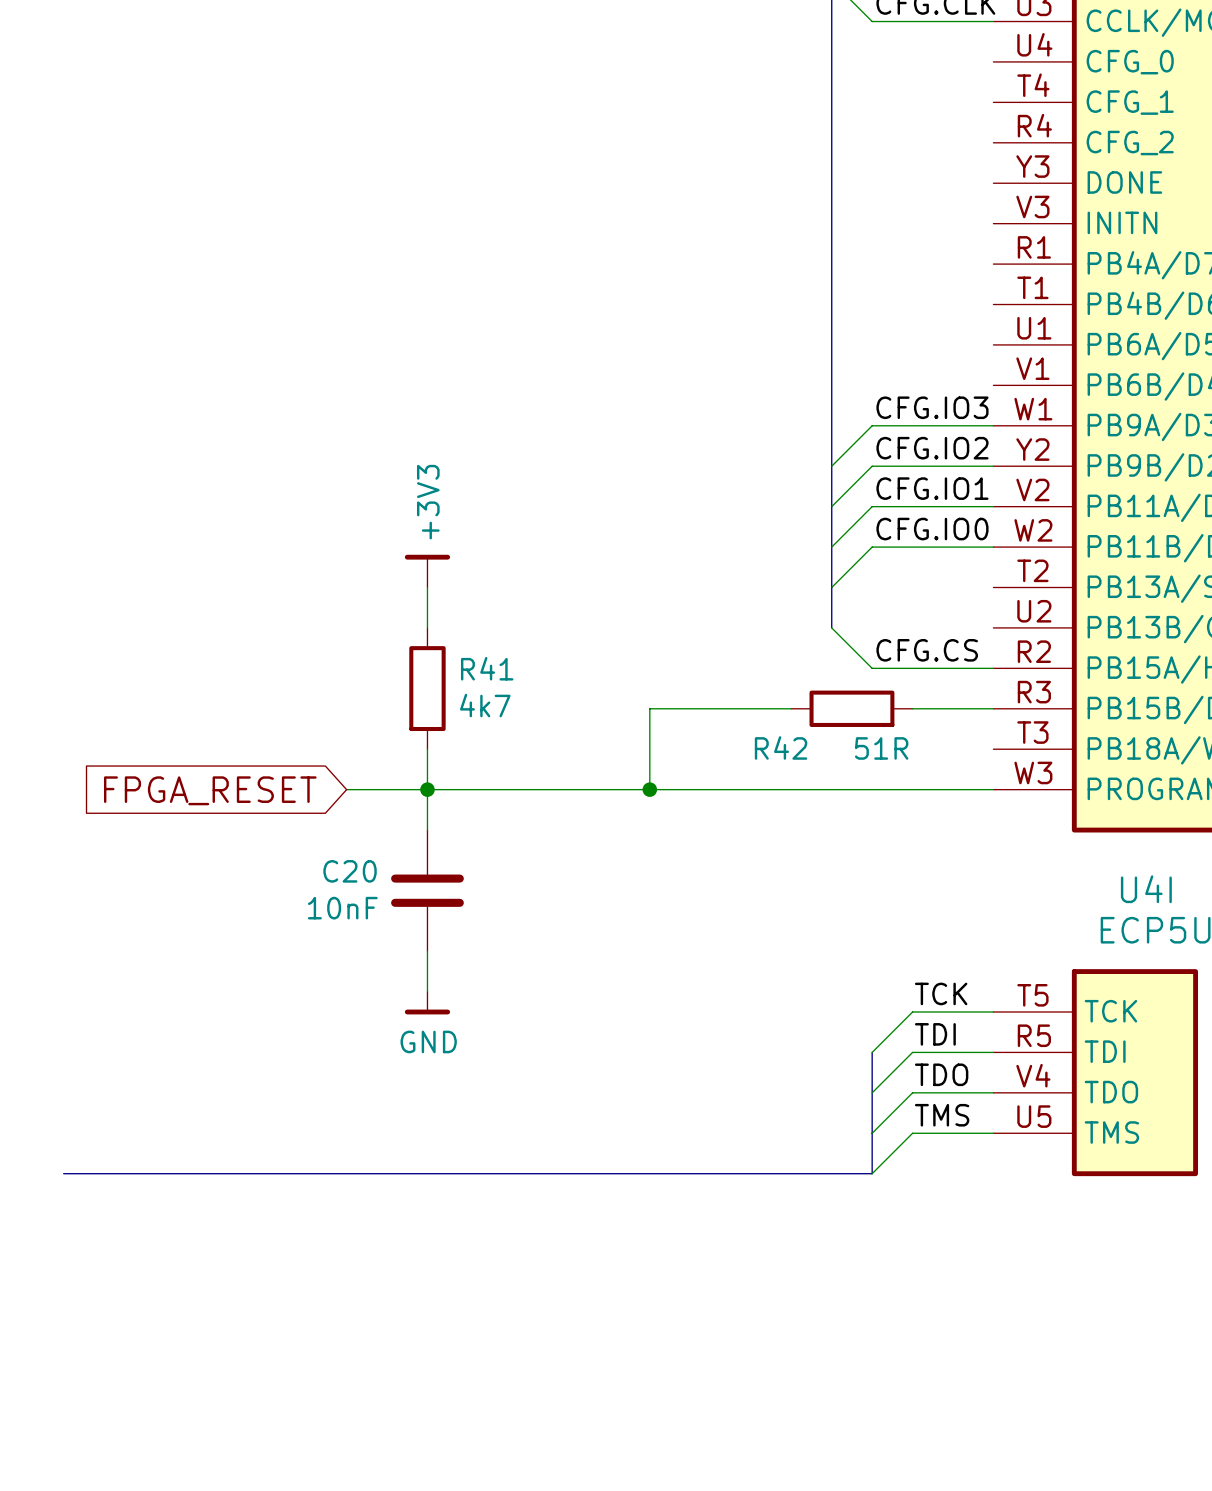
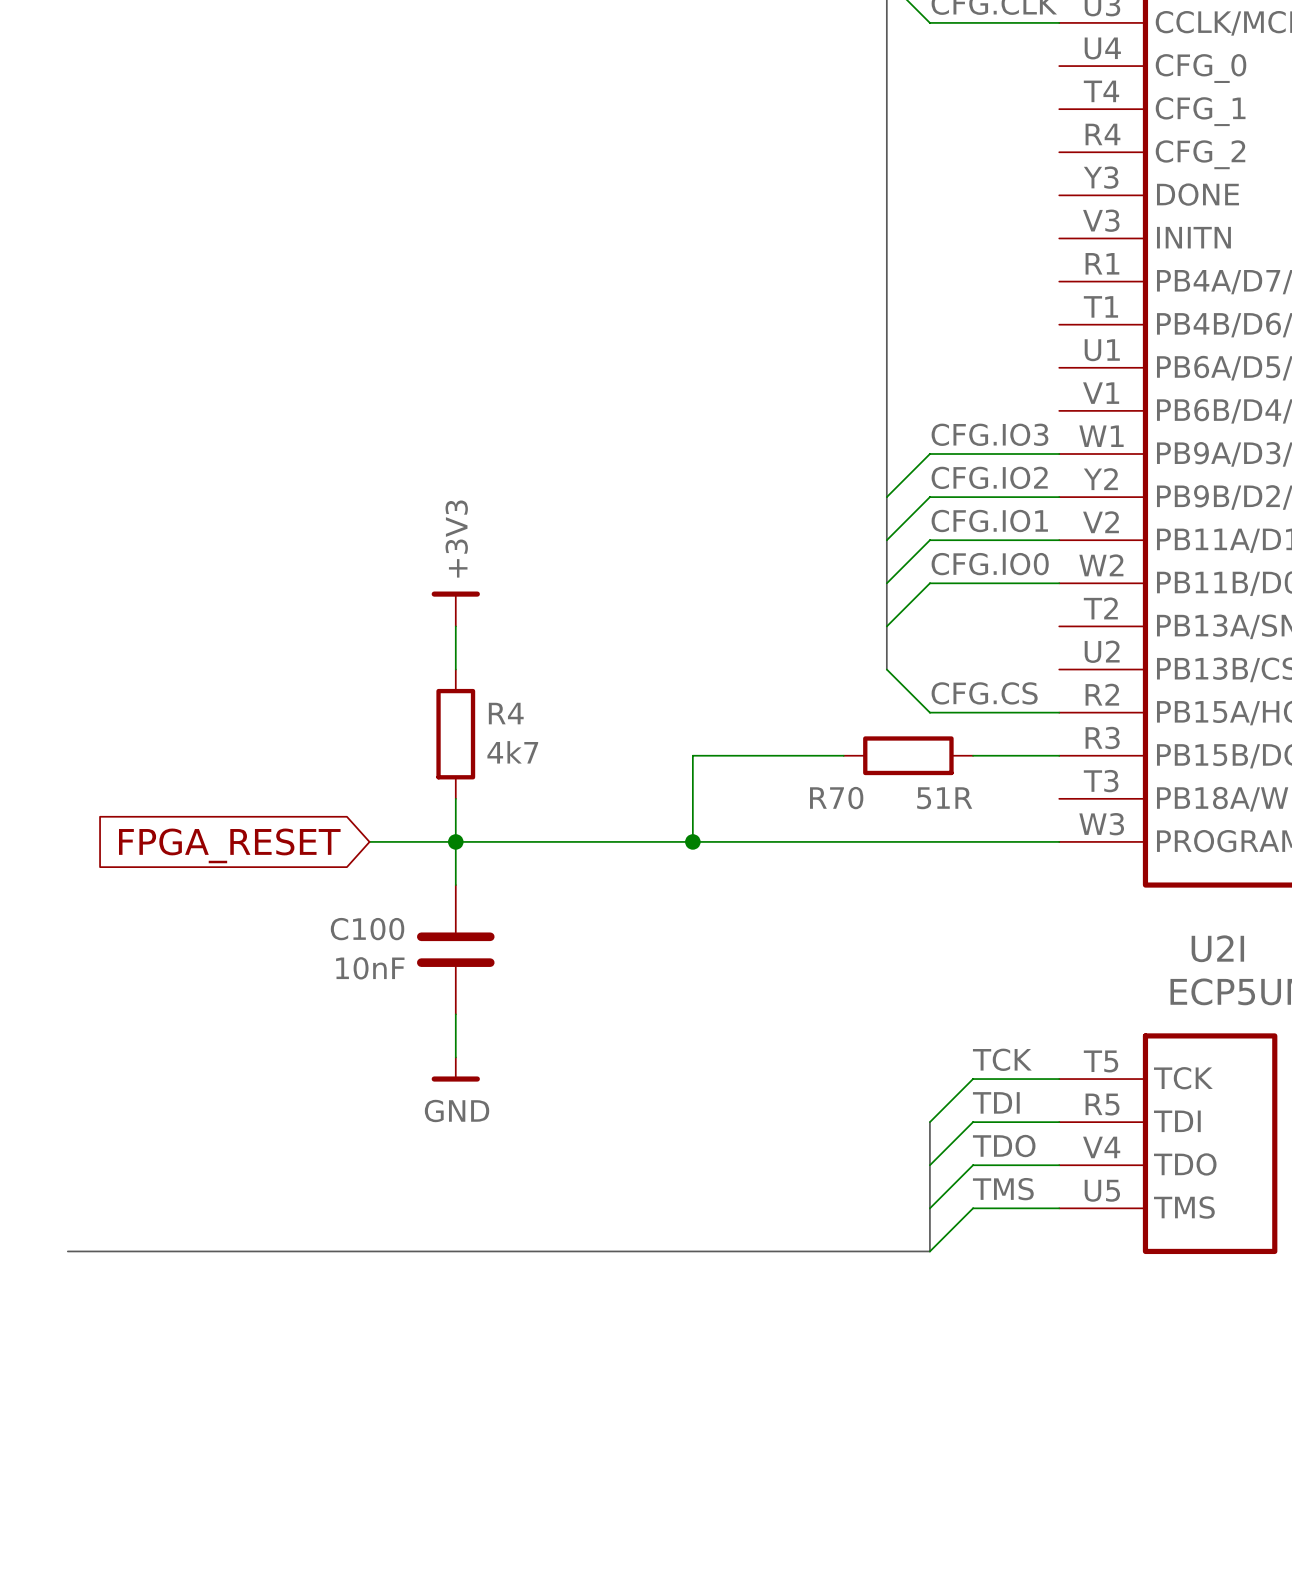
R41 name: R41 (487, 668) -> R4 (506, 713)
R42 name: R42 (781, 747) -> R70 (836, 798)
C20 name: C20 (350, 871) -> C100 (367, 929)
U4I name: U4I (1146, 889) -> U2I (1217, 948)

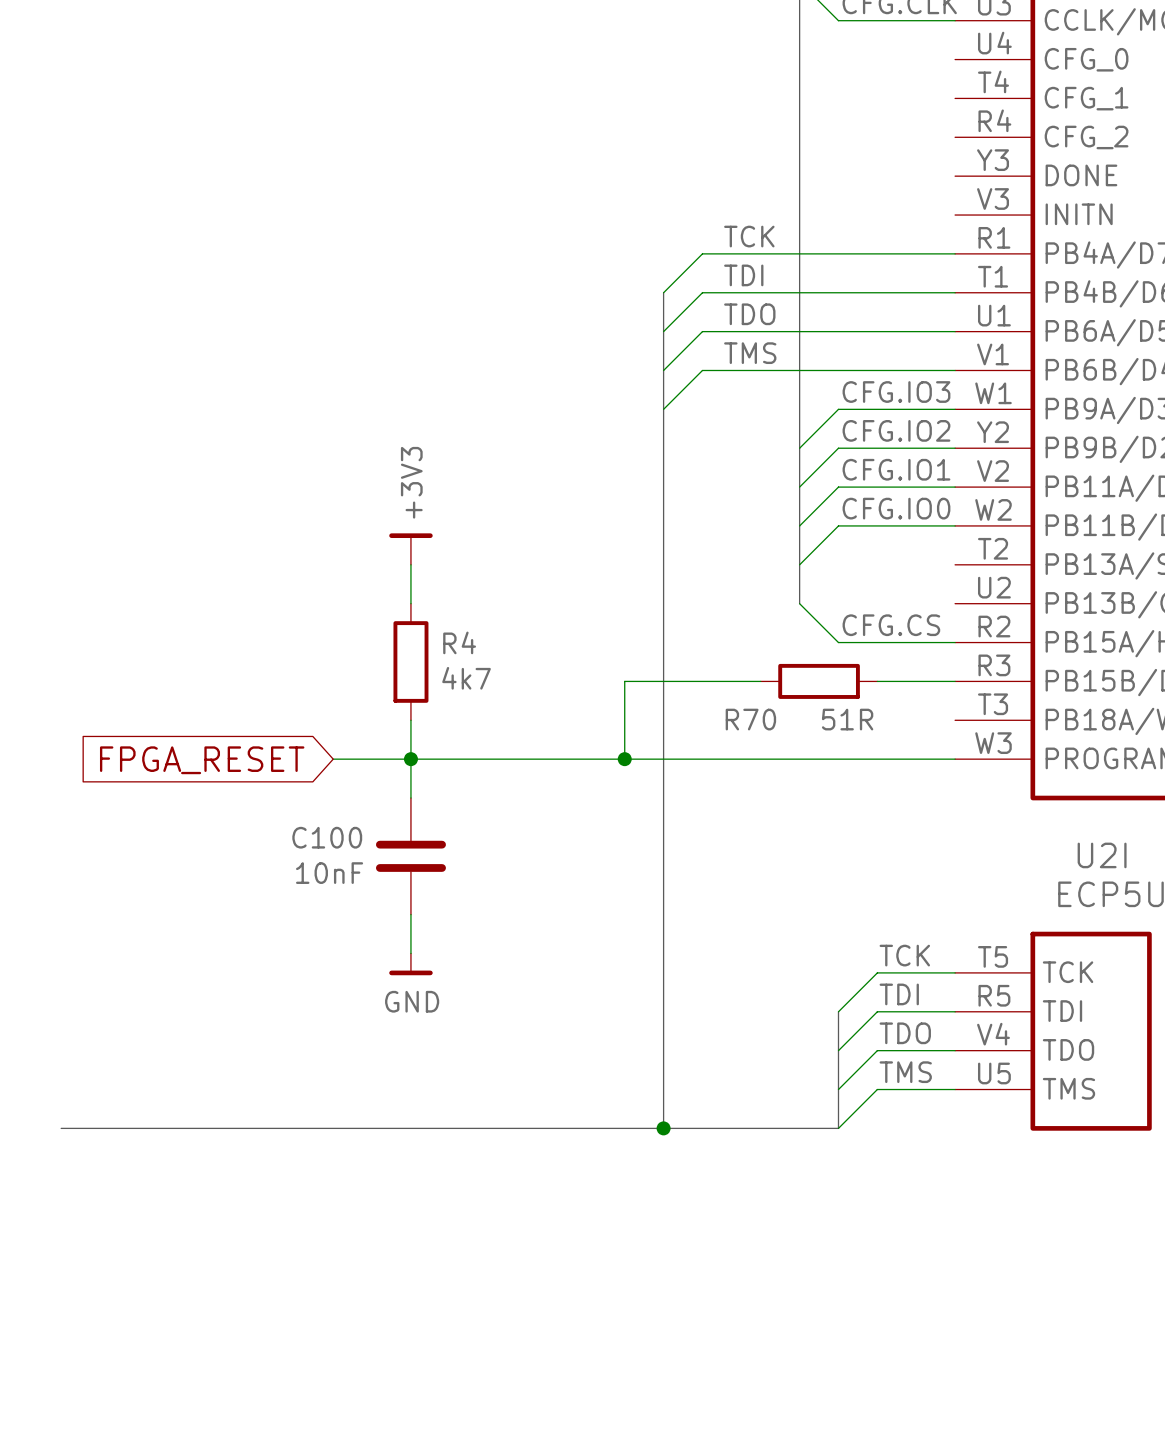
label: none -> TCK (749, 236)
wire: none -> (955, 253) (702, 253) (663, 292)
label: none -> TDI (743, 275)
bus: none -> (663, 292) (663, 1128)
wire: none -> (955, 292) (702, 292) (663, 331)
label: none -> TDO (749, 314)
wire: none -> (955, 331) (702, 331) (663, 370)
label: none -> TMS (750, 353)
wire: none -> (955, 370) (702, 370) (663, 409)
junction: none -> (663, 1128)

